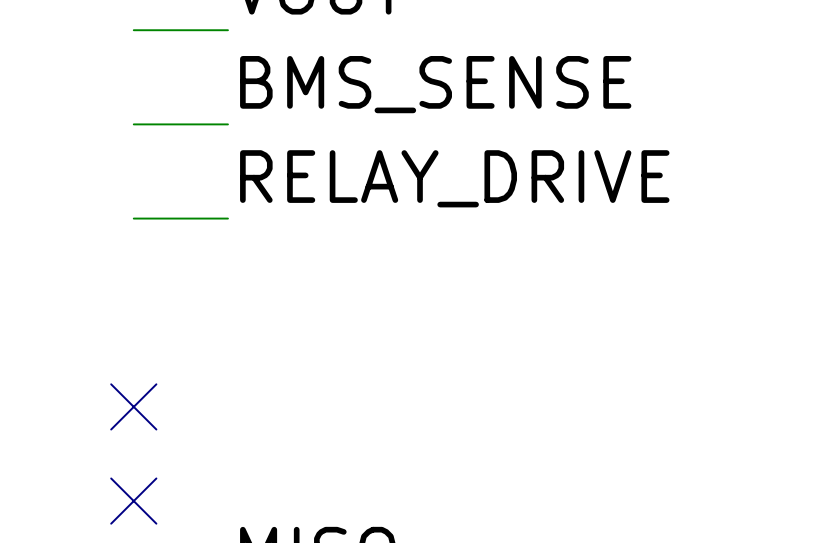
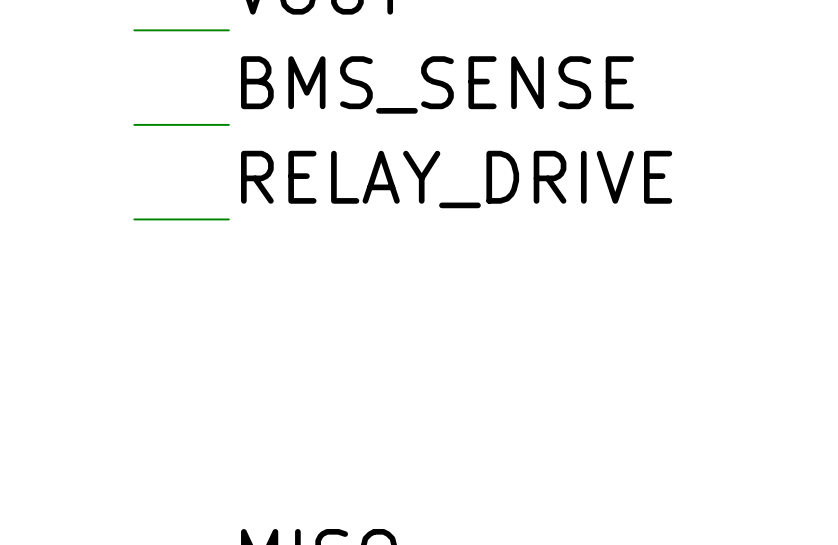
no-connect mark: (133, 406) -> none
no-connect mark: (133, 501) -> none

